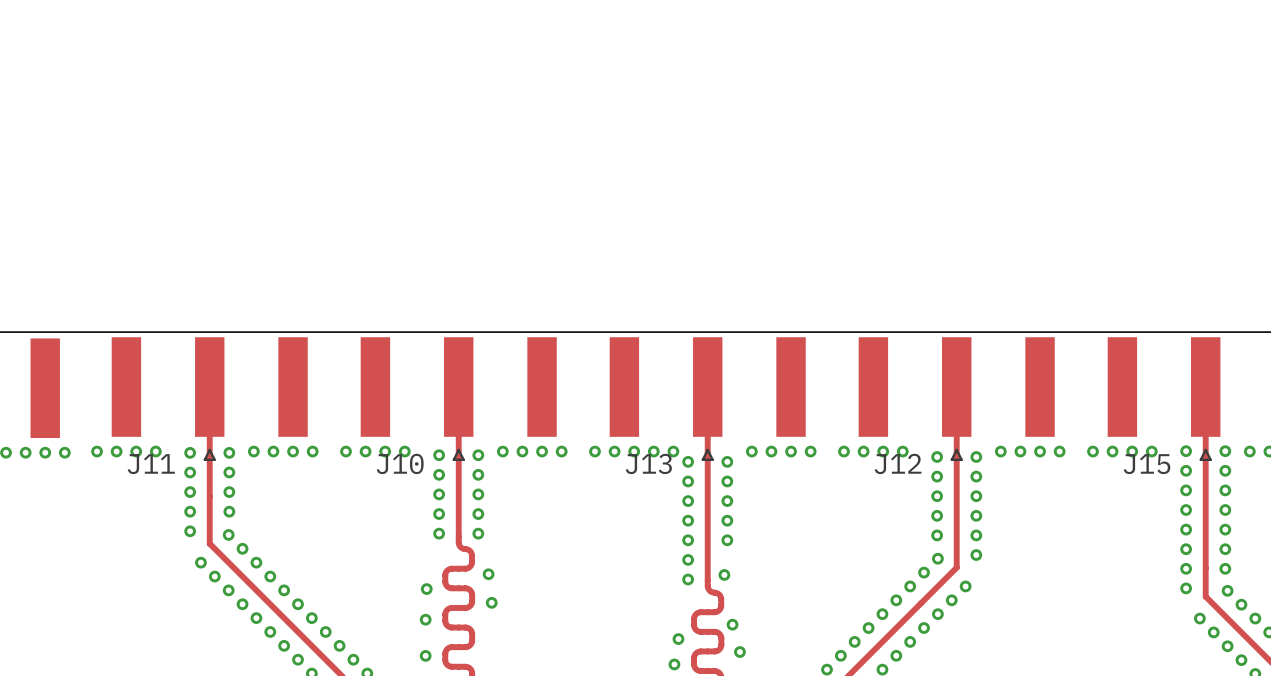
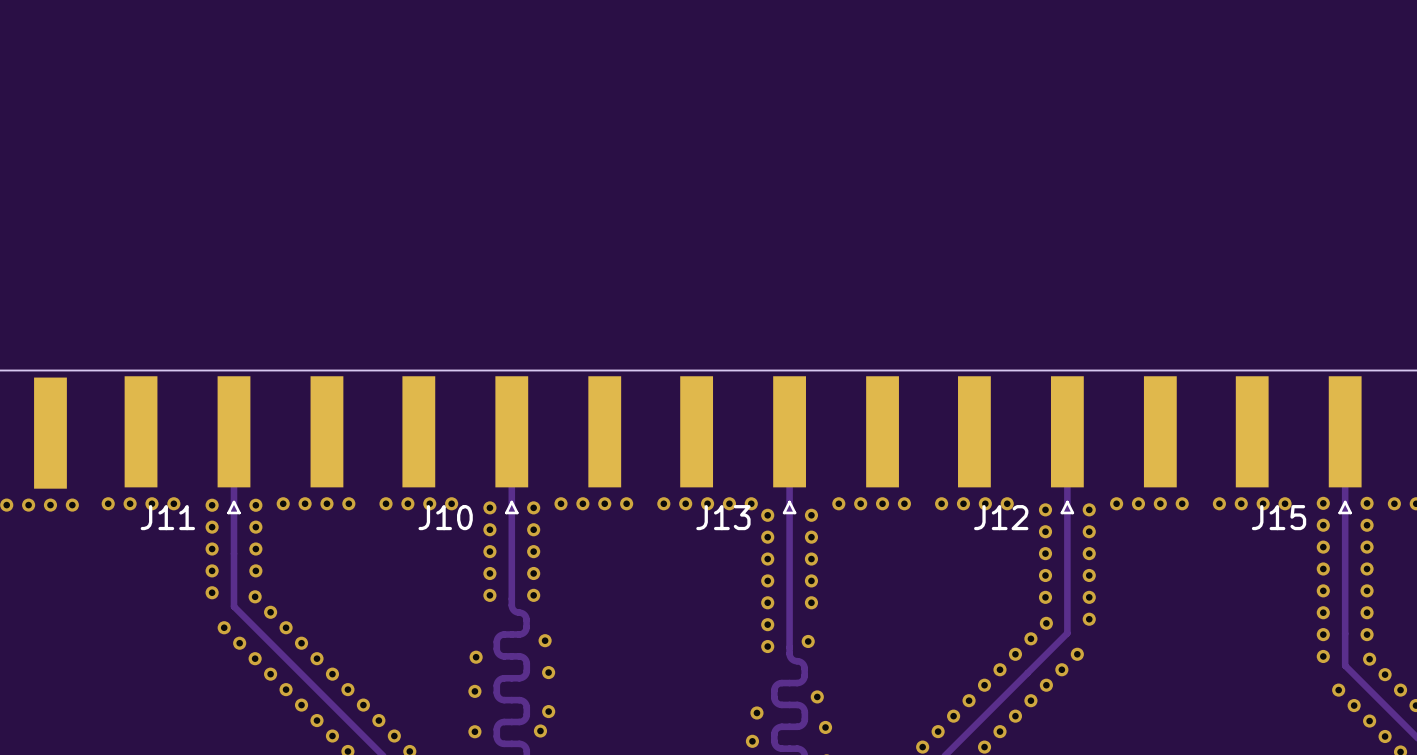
via: none -> (548, 711)
via: none -> (540, 731)

